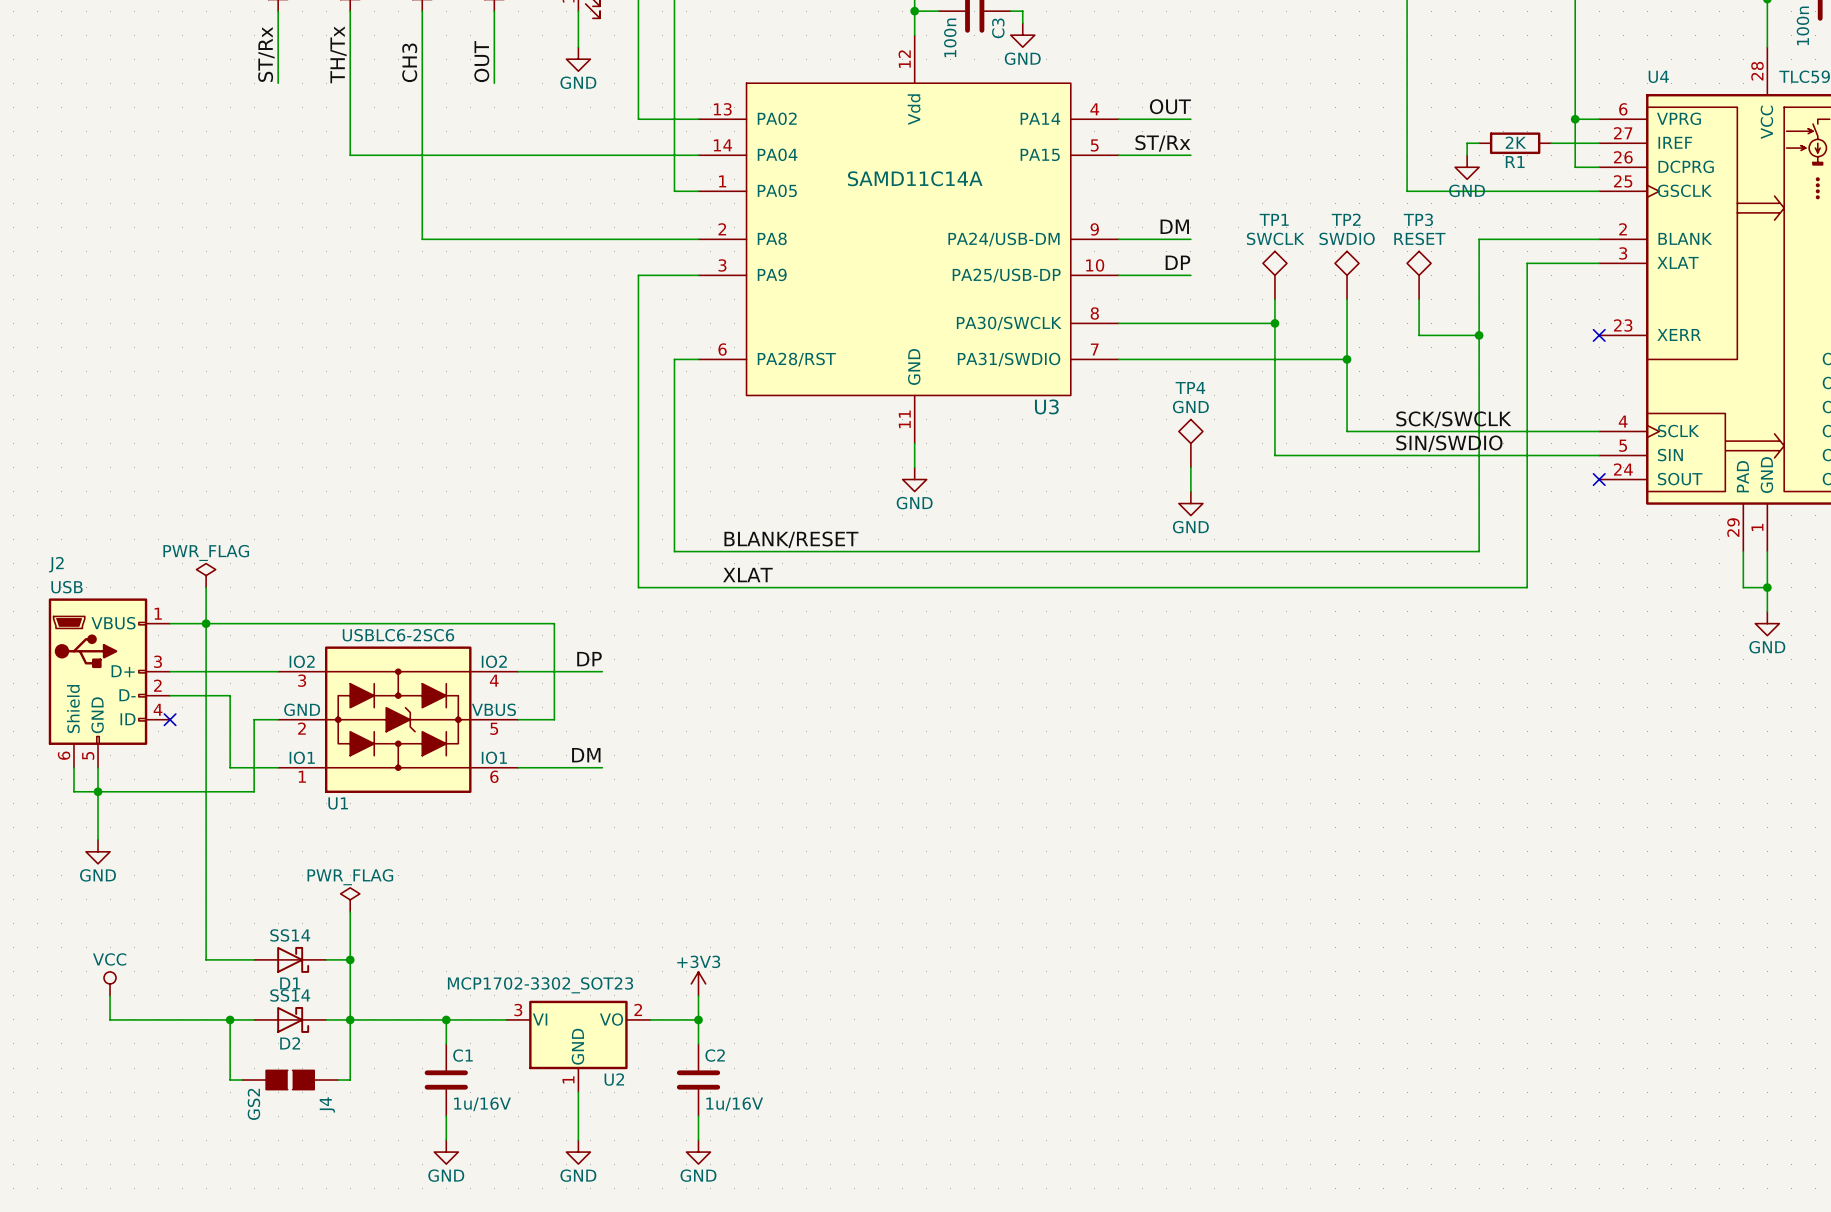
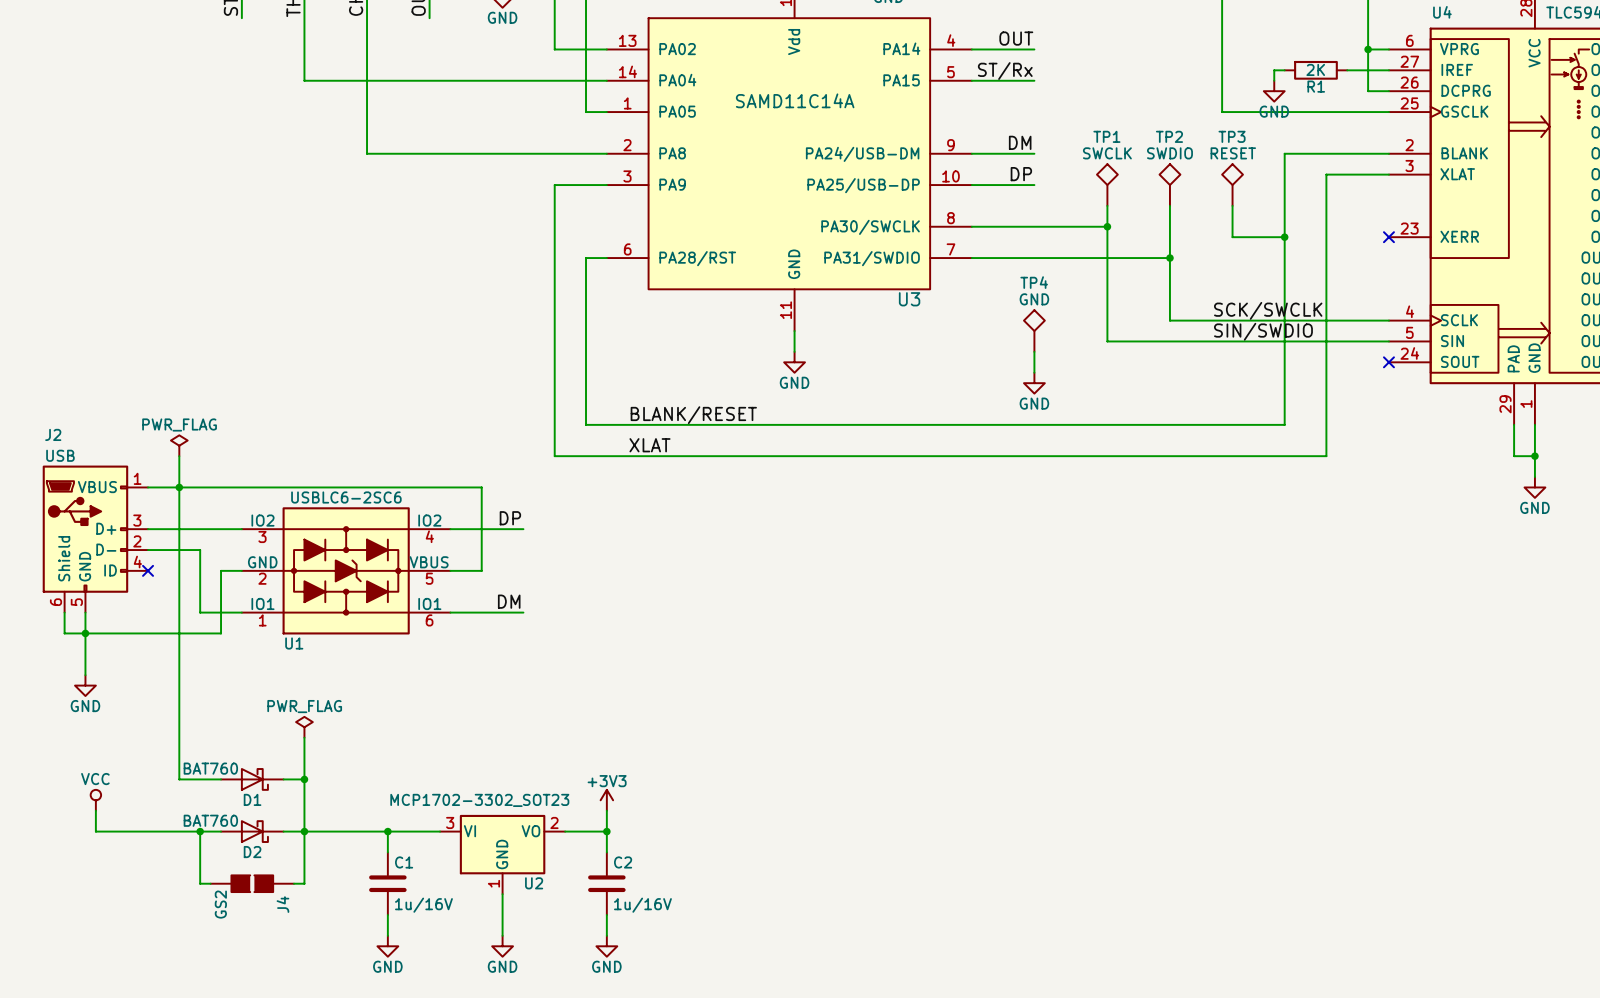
D1 value: SS14 (290, 935) -> BAT760 (210, 768)
D2 value: SS14 (290, 995) -> BAT760 (210, 820)

